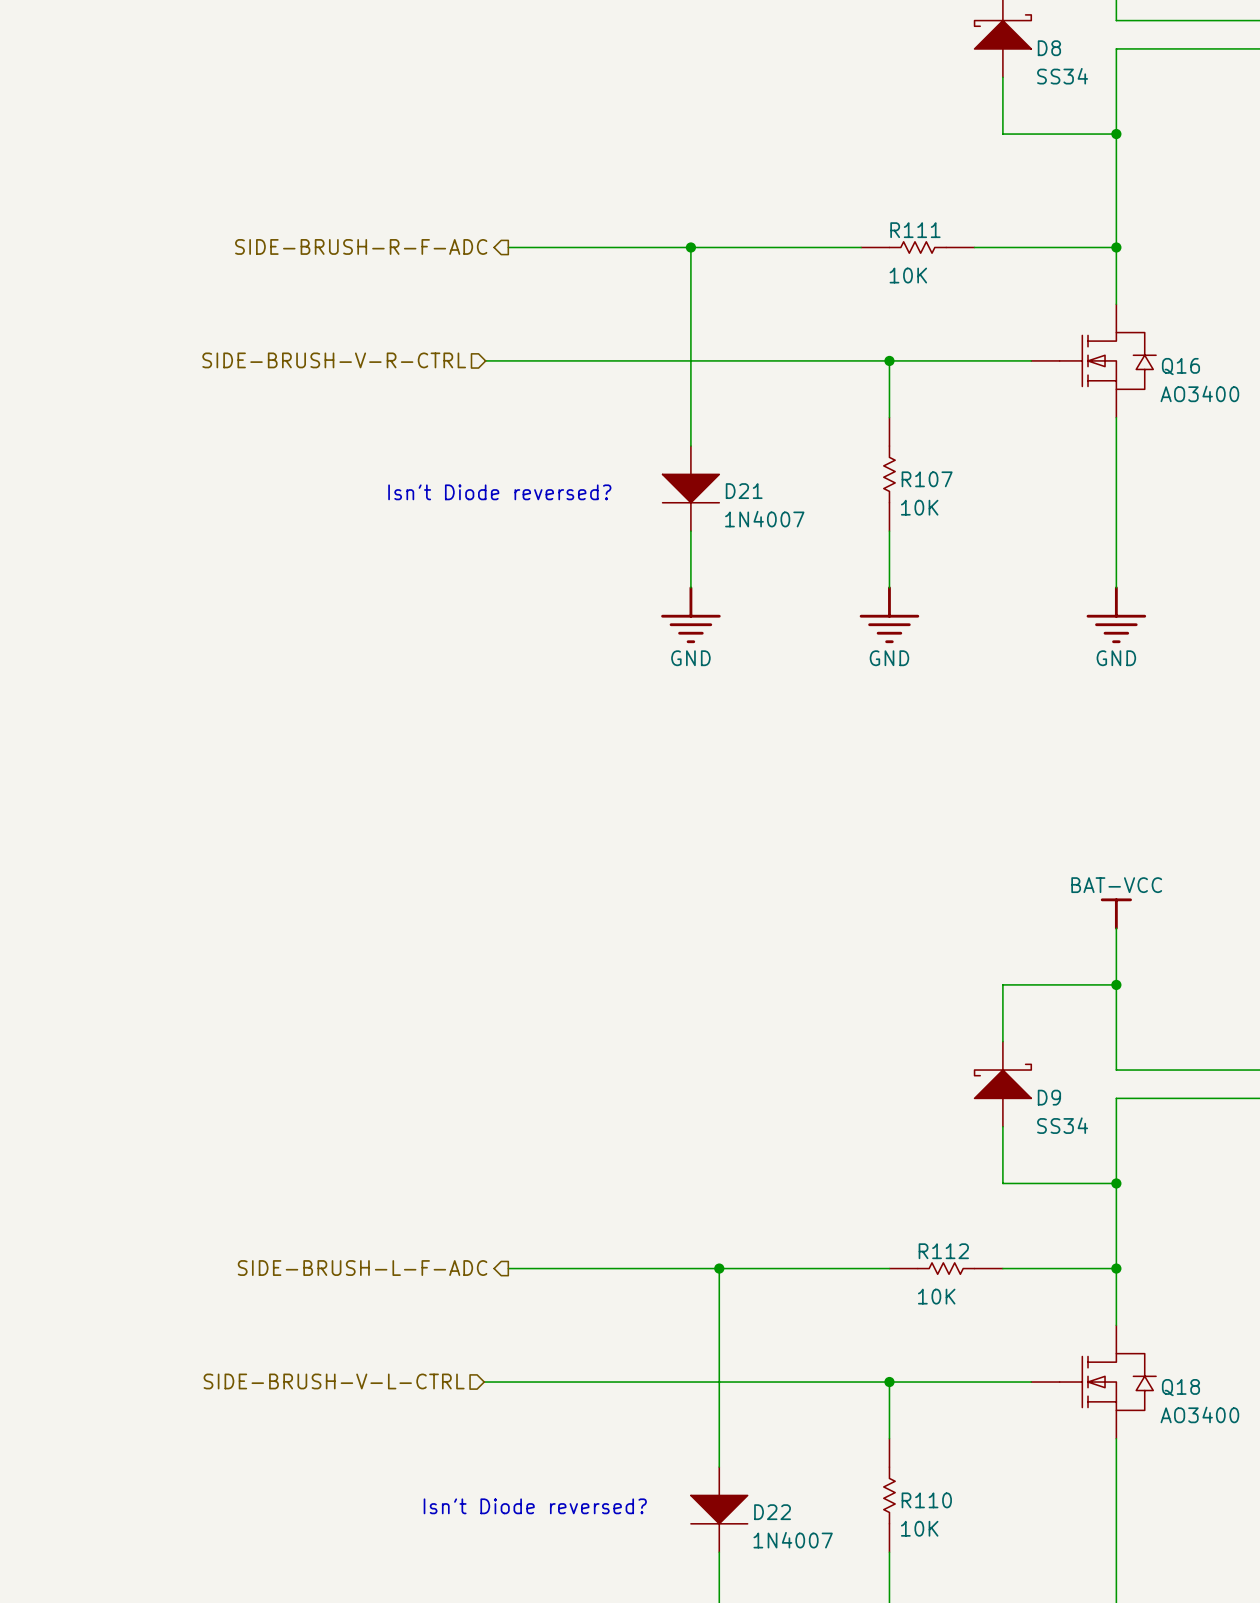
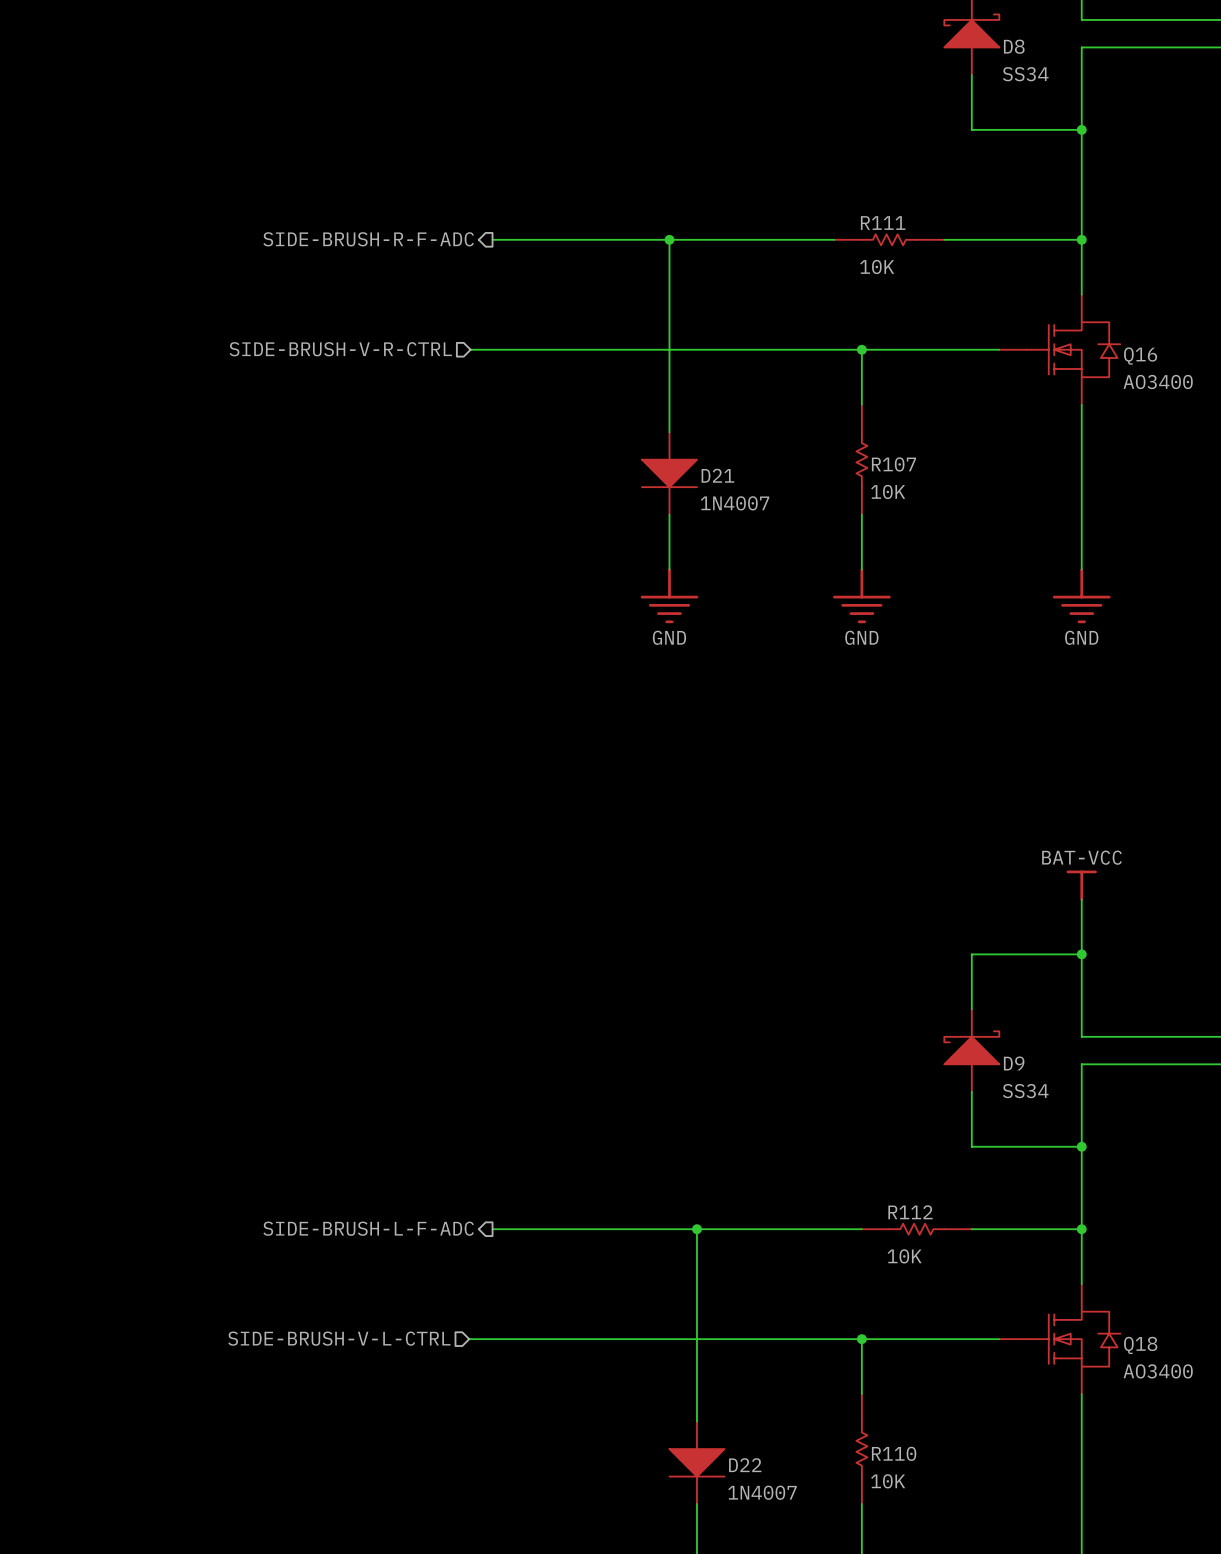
text: Isn't Diode reversed? (499, 492) -> none
text: Isn't Diode reversed? (535, 1506) -> none

